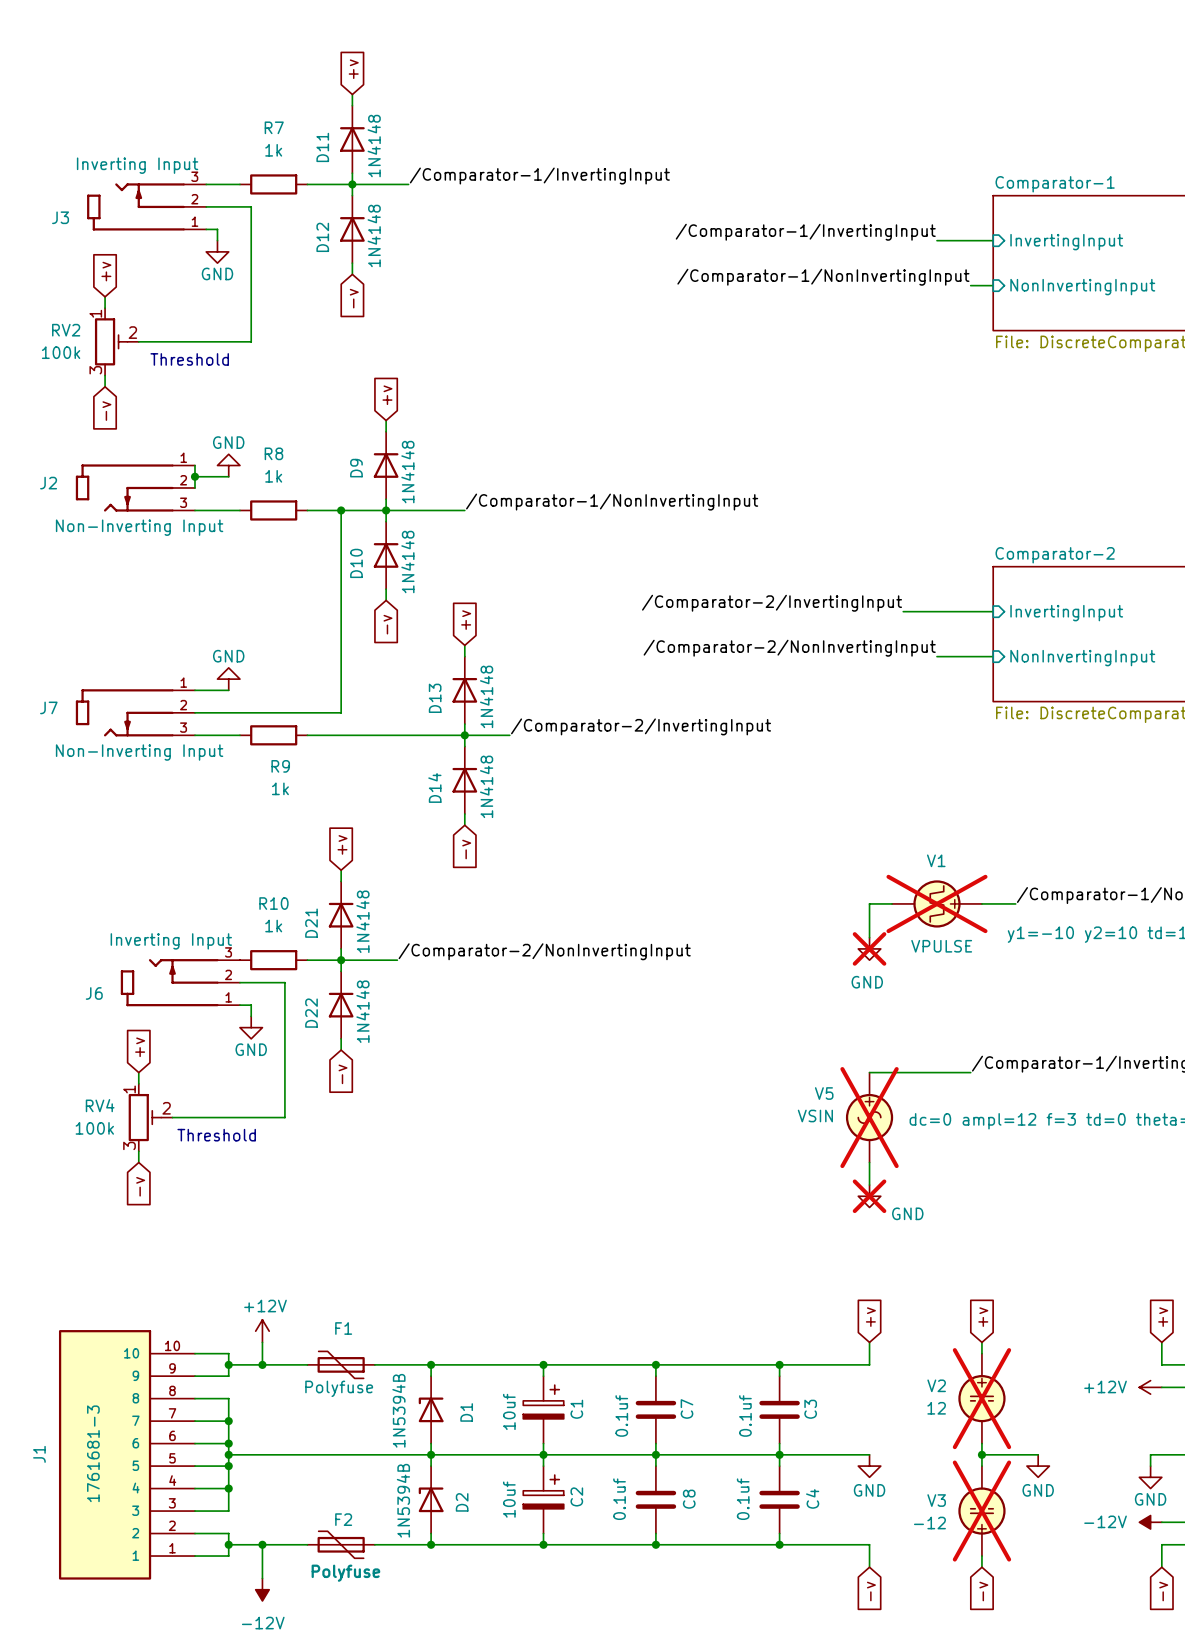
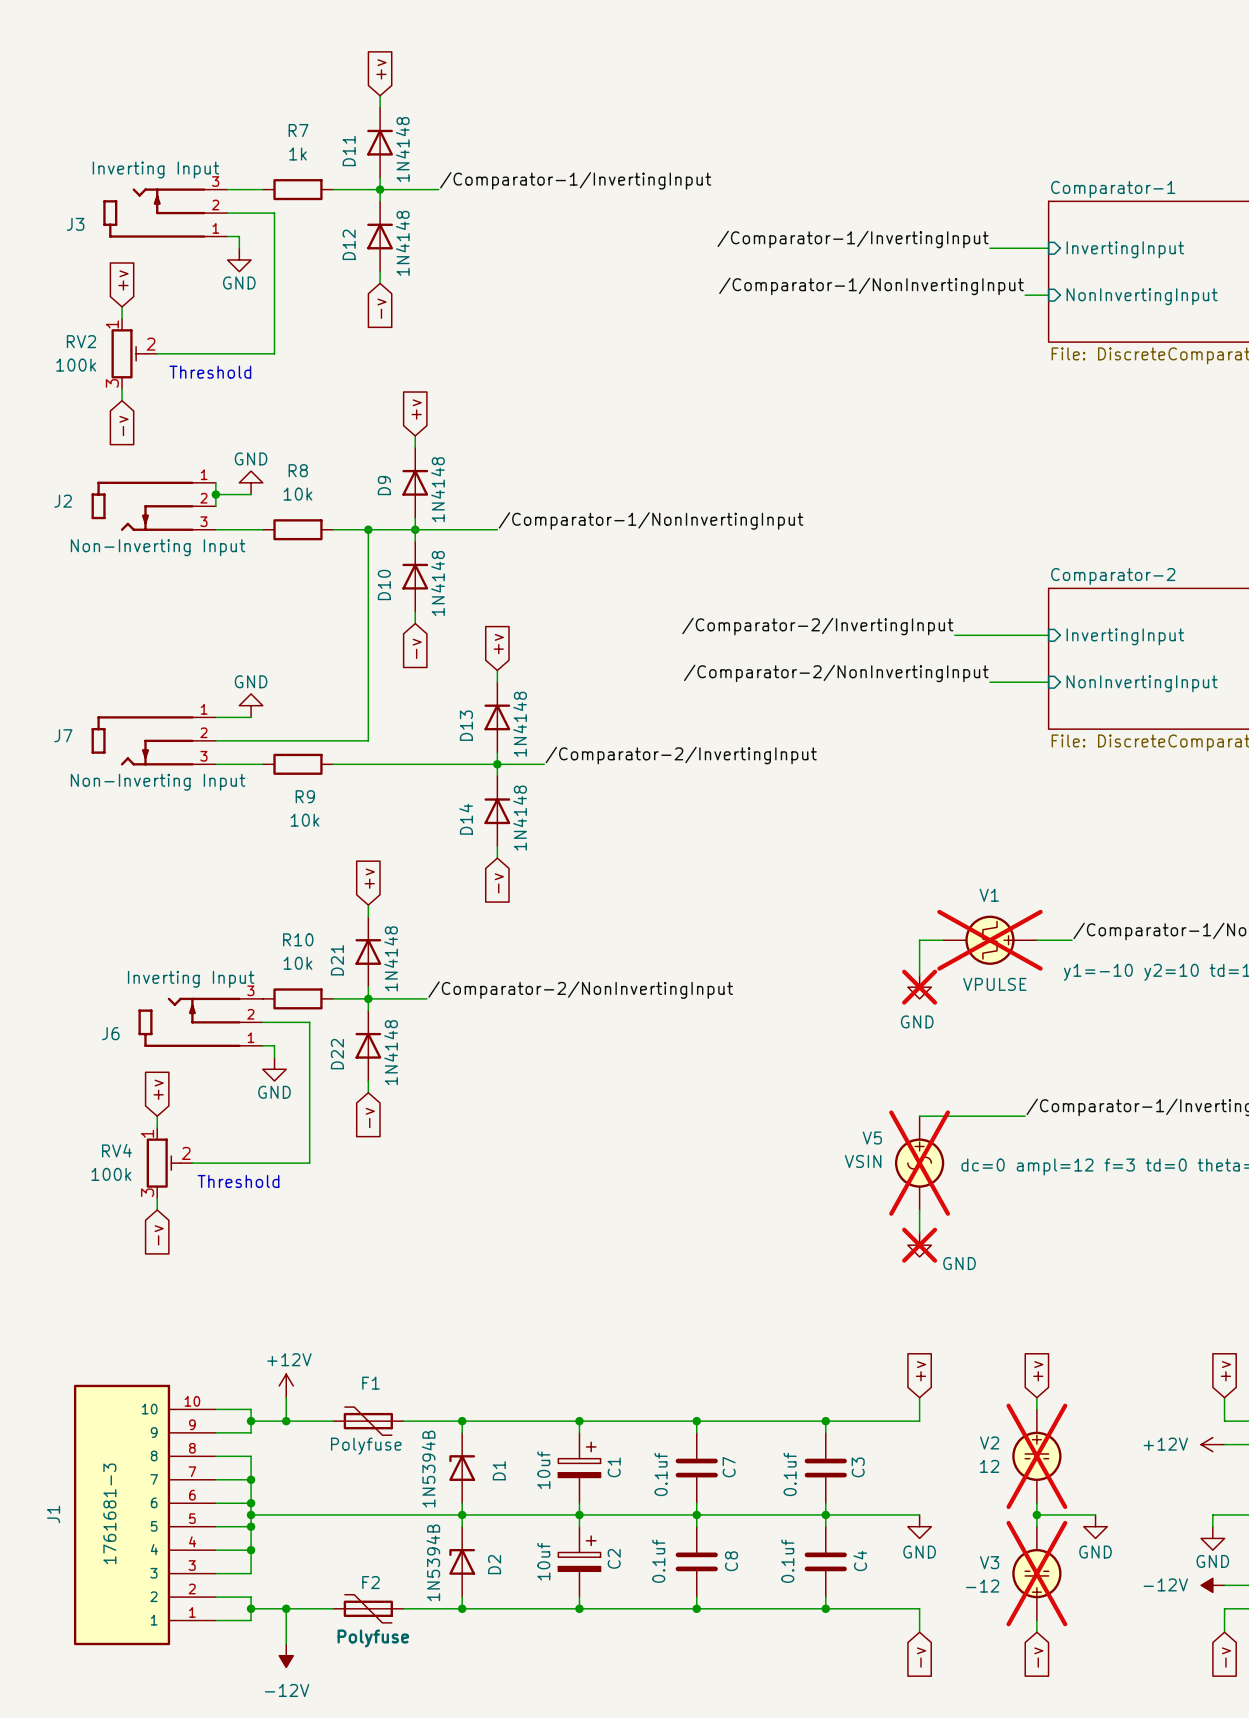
R8 value: 1k (273, 476) -> 10k (297, 494)
R9 value: 1k (280, 788) -> 10k (305, 820)
R10 value: 1k (273, 926) -> 10k (297, 963)

